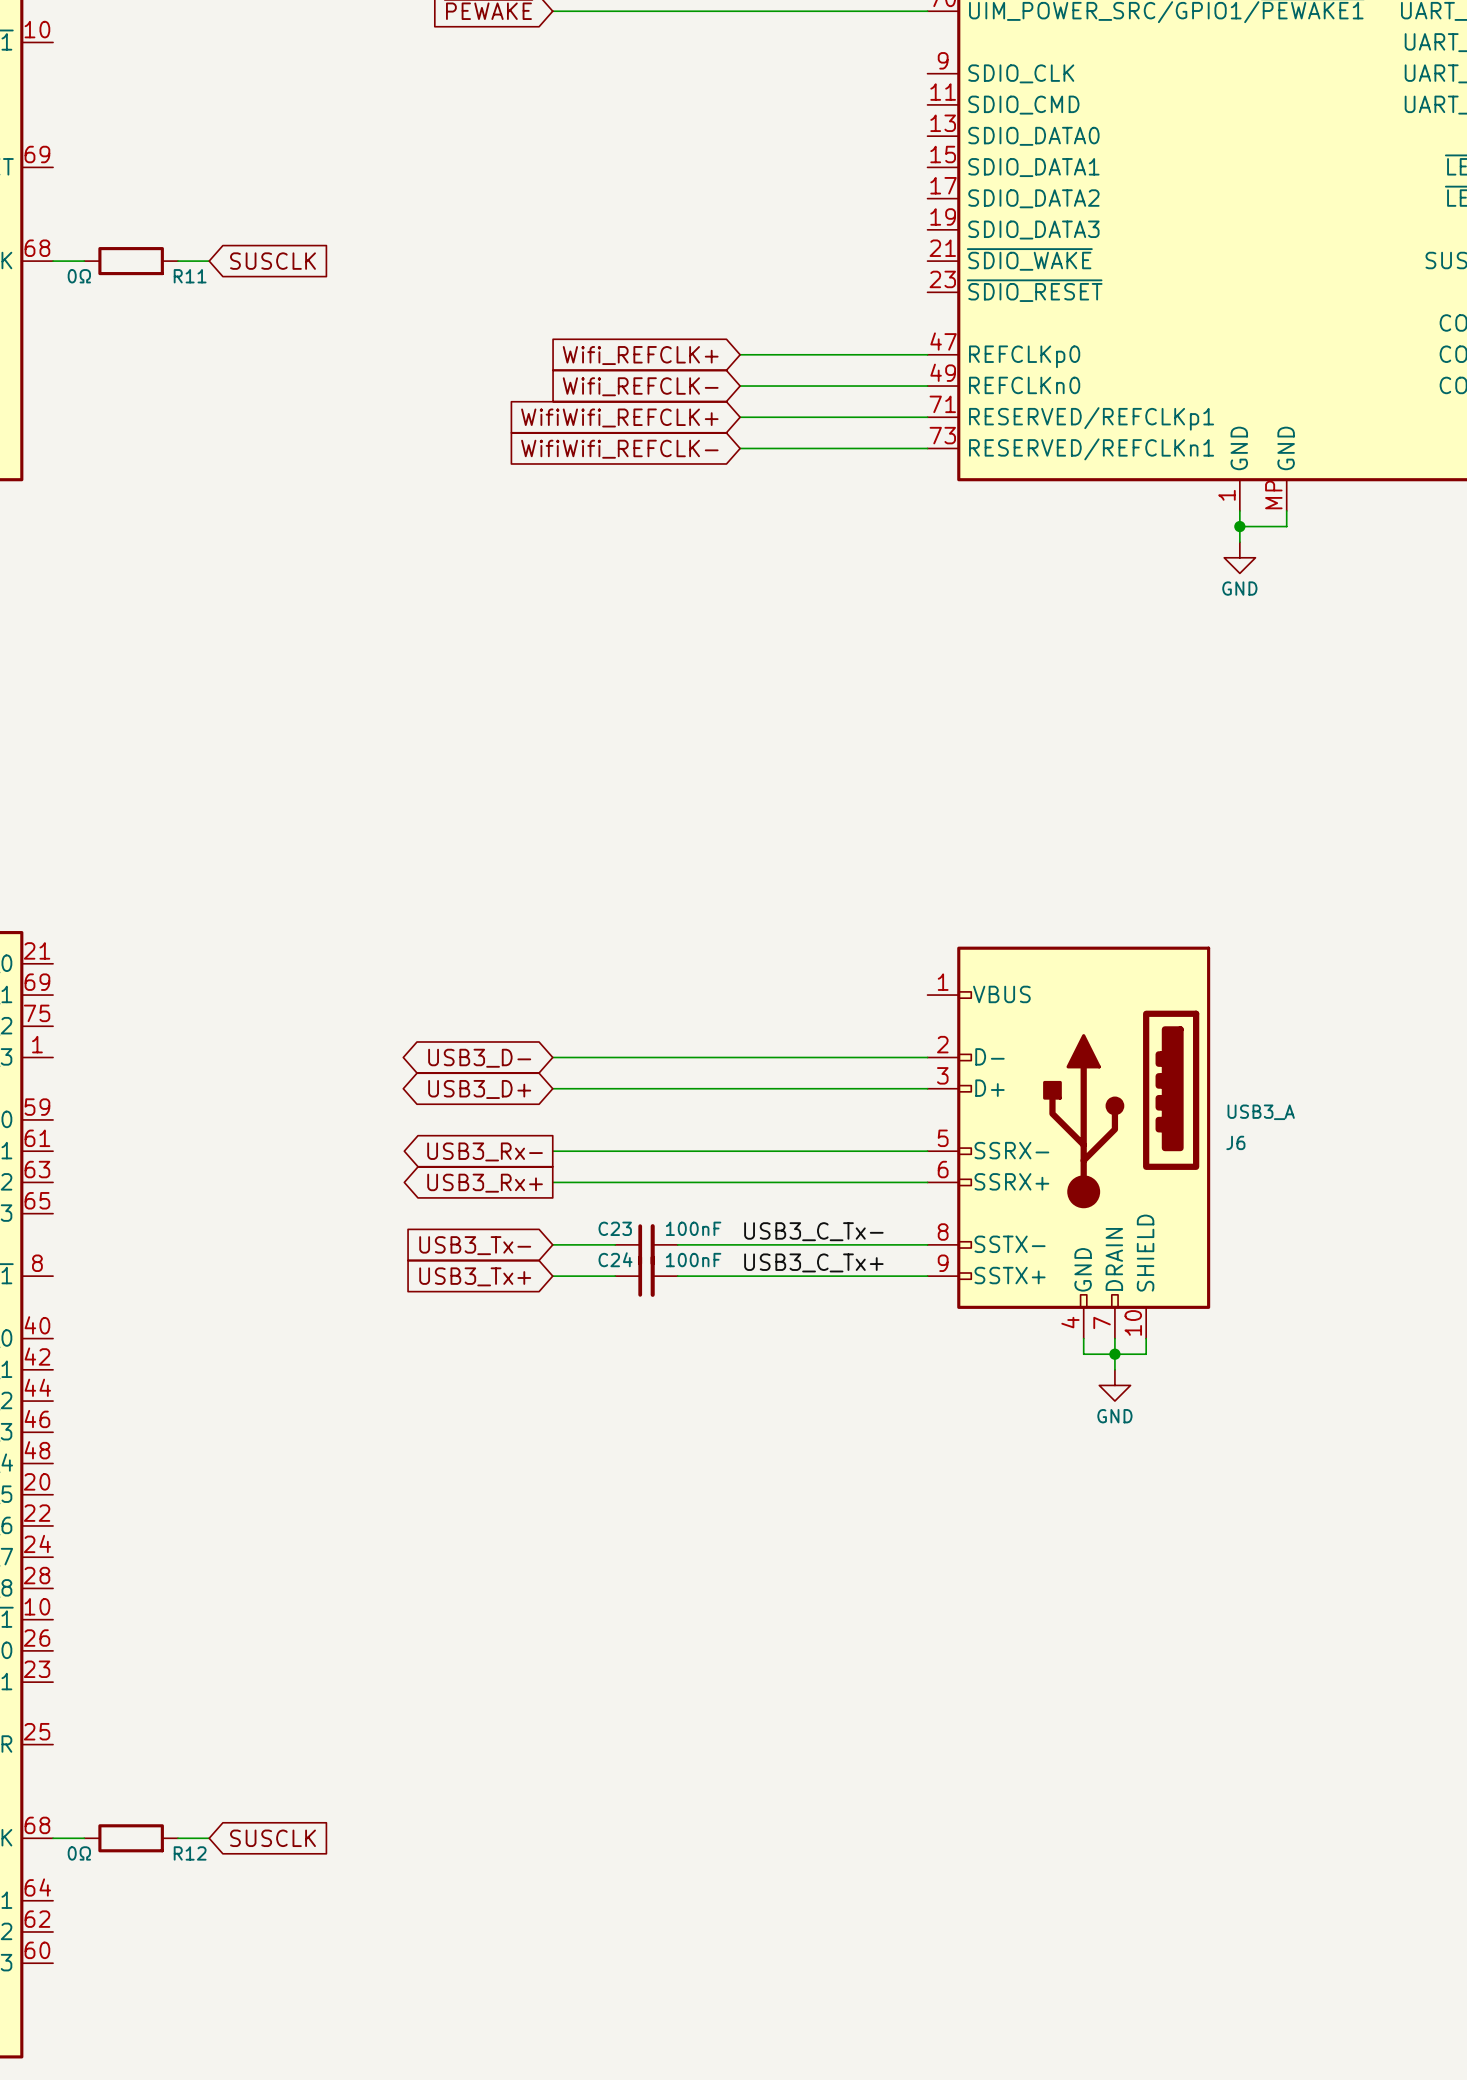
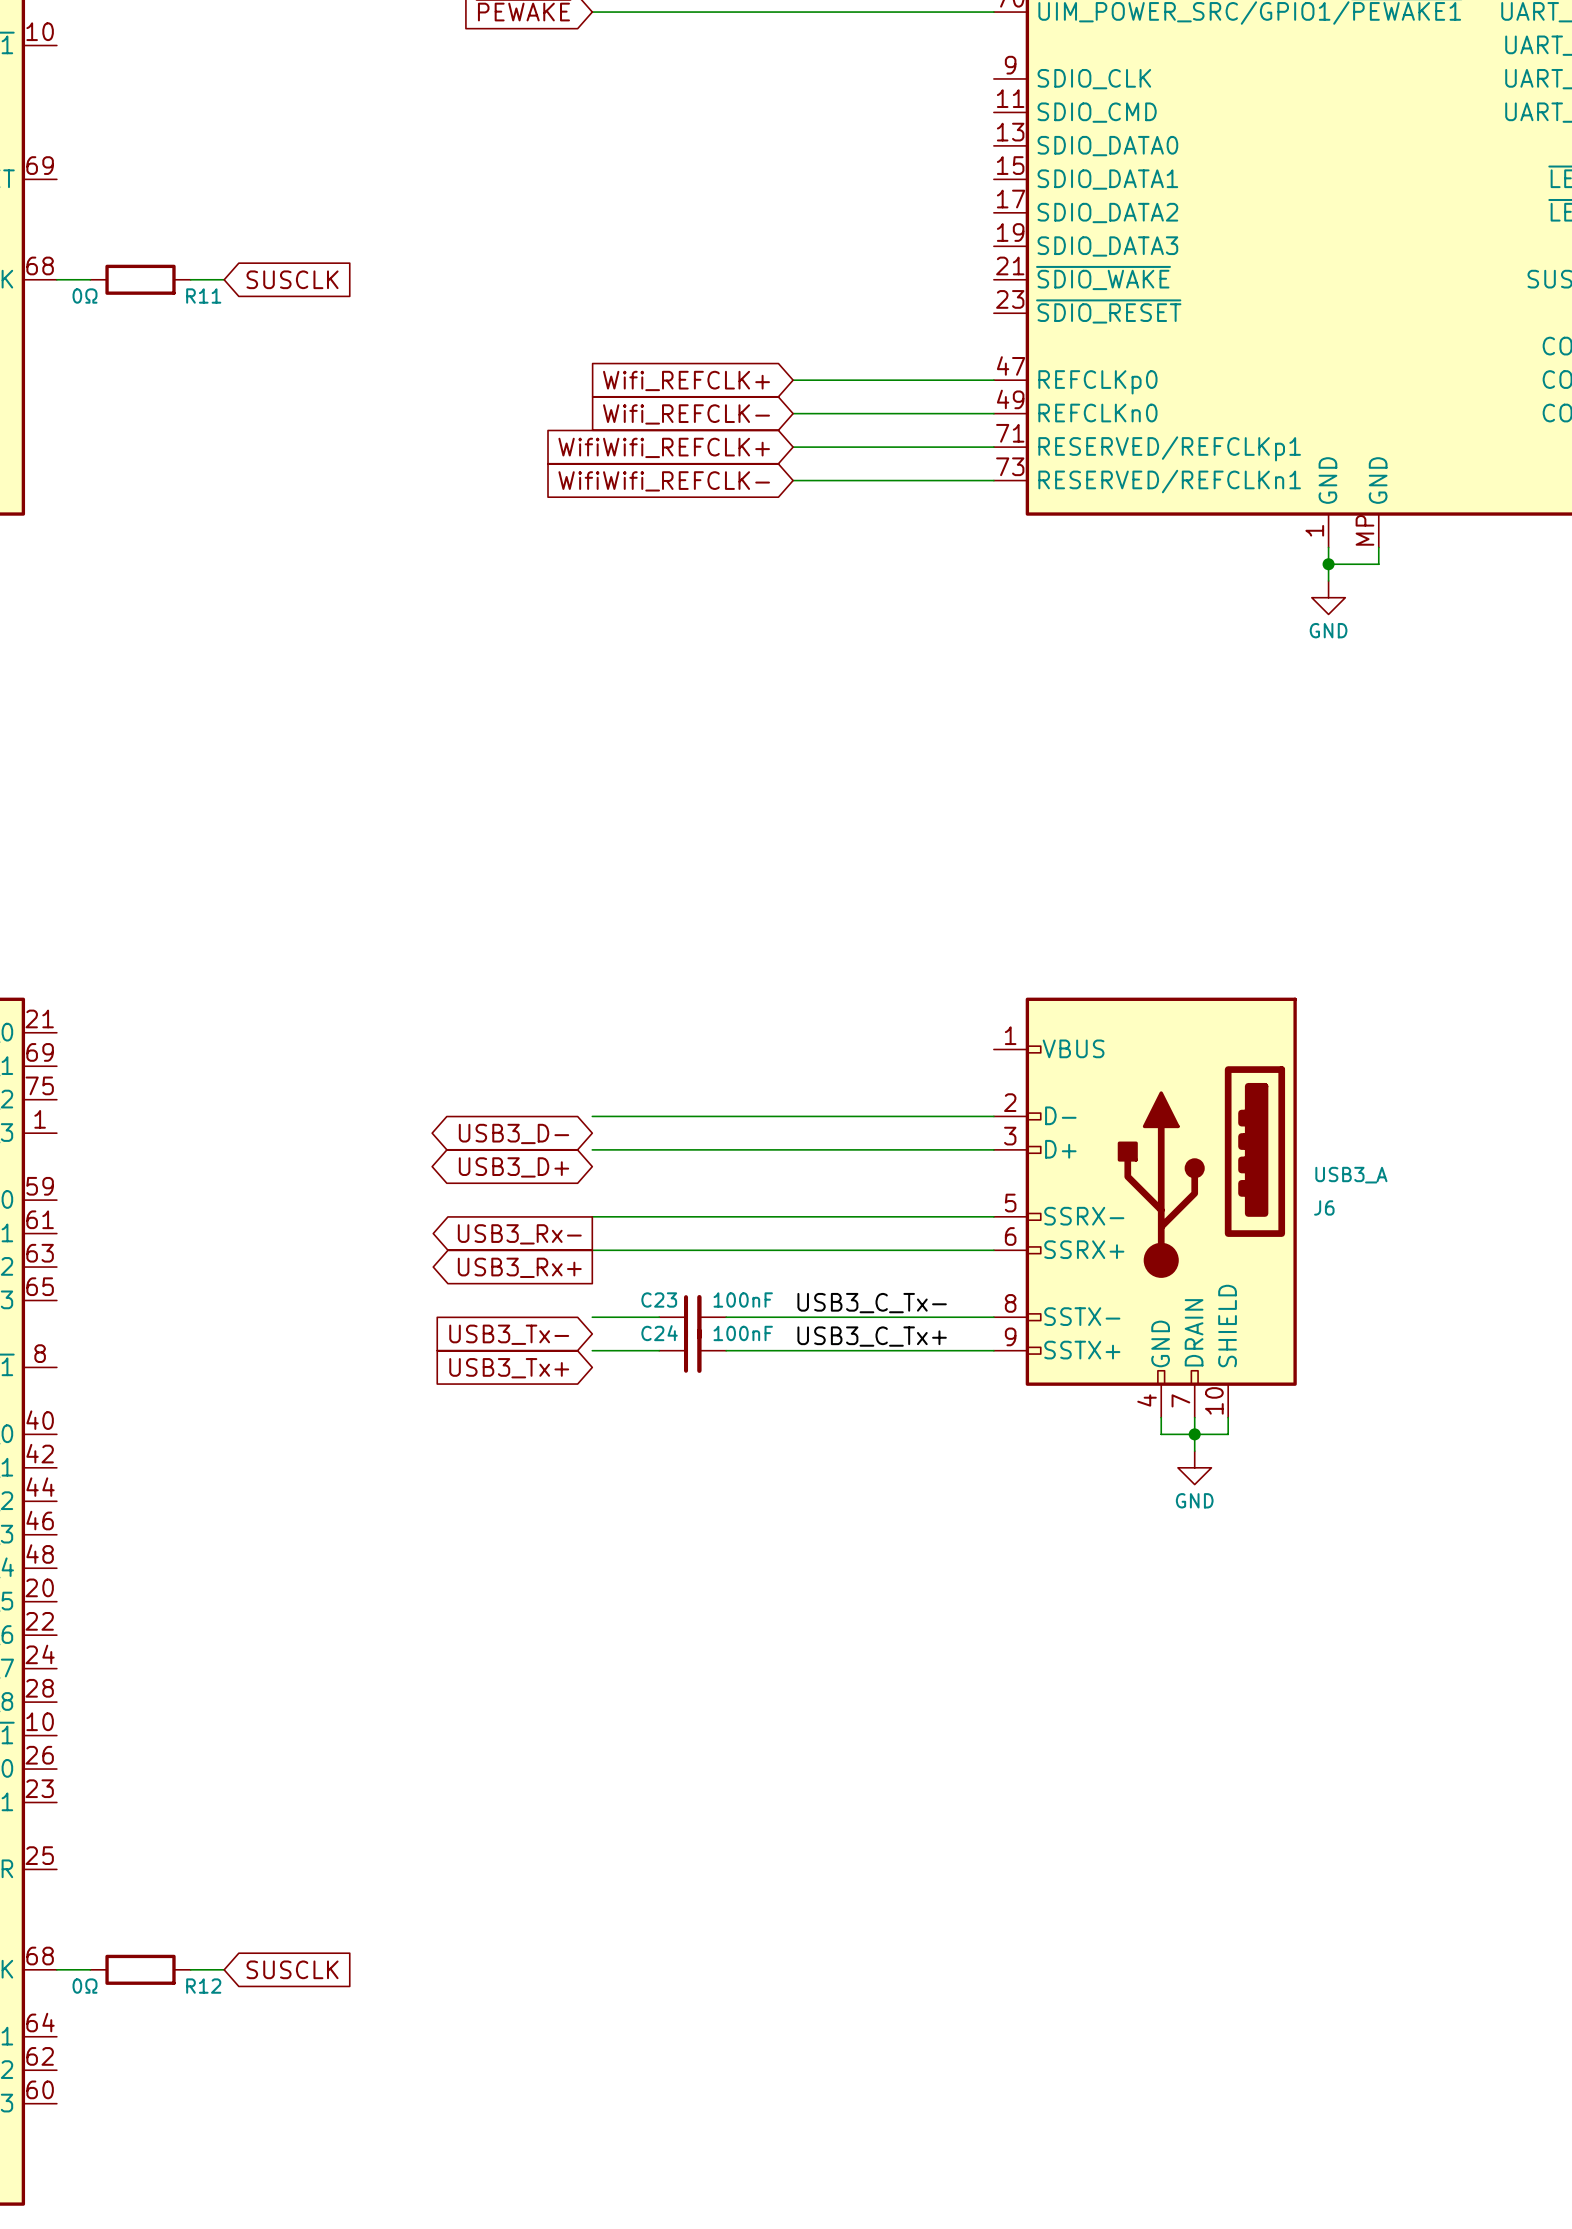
wire: (552, 1057) (927, 1057) -> (592, 1116) (993, 1116)
wire: (552, 1088) (927, 1088) -> (592, 1149) (993, 1149)
J6 position: (1068, 1142) -> (1145, 1207)
wire: (552, 1151) (927, 1151) -> (592, 1216) (993, 1216)
wire: (552, 1182) (927, 1182) -> (592, 1250) (993, 1250)
label position: USB3_C_Tx- (813, 1231) -> USB3_C_Tx- (872, 1303)
wire: (552, 1244) (615, 1244) -> (592, 1317) (659, 1317)
C23 position: (646, 1244) -> (692, 1317)
wire: (677, 1244) (927, 1244) -> (726, 1317) (993, 1317)
label position: USB3_C_Tx+ (813, 1262) -> USB3_C_Tx+ (872, 1336)
wire: (552, 1276) (615, 1276) -> (592, 1350) (659, 1350)
C24 position: (646, 1276) -> (692, 1350)
wire: (677, 1276) (927, 1276) -> (726, 1350) (993, 1350)
wire: (1083, 1338) (1083, 1354) (1146, 1354) (1146, 1338) -> (1161, 1417) (1161, 1434) (1228, 1434) (1228, 1417)
junction position: (1114, 1354) -> (1194, 1434)
power symbol position: GND (1114, 1385) -> GND (1194, 1467)

